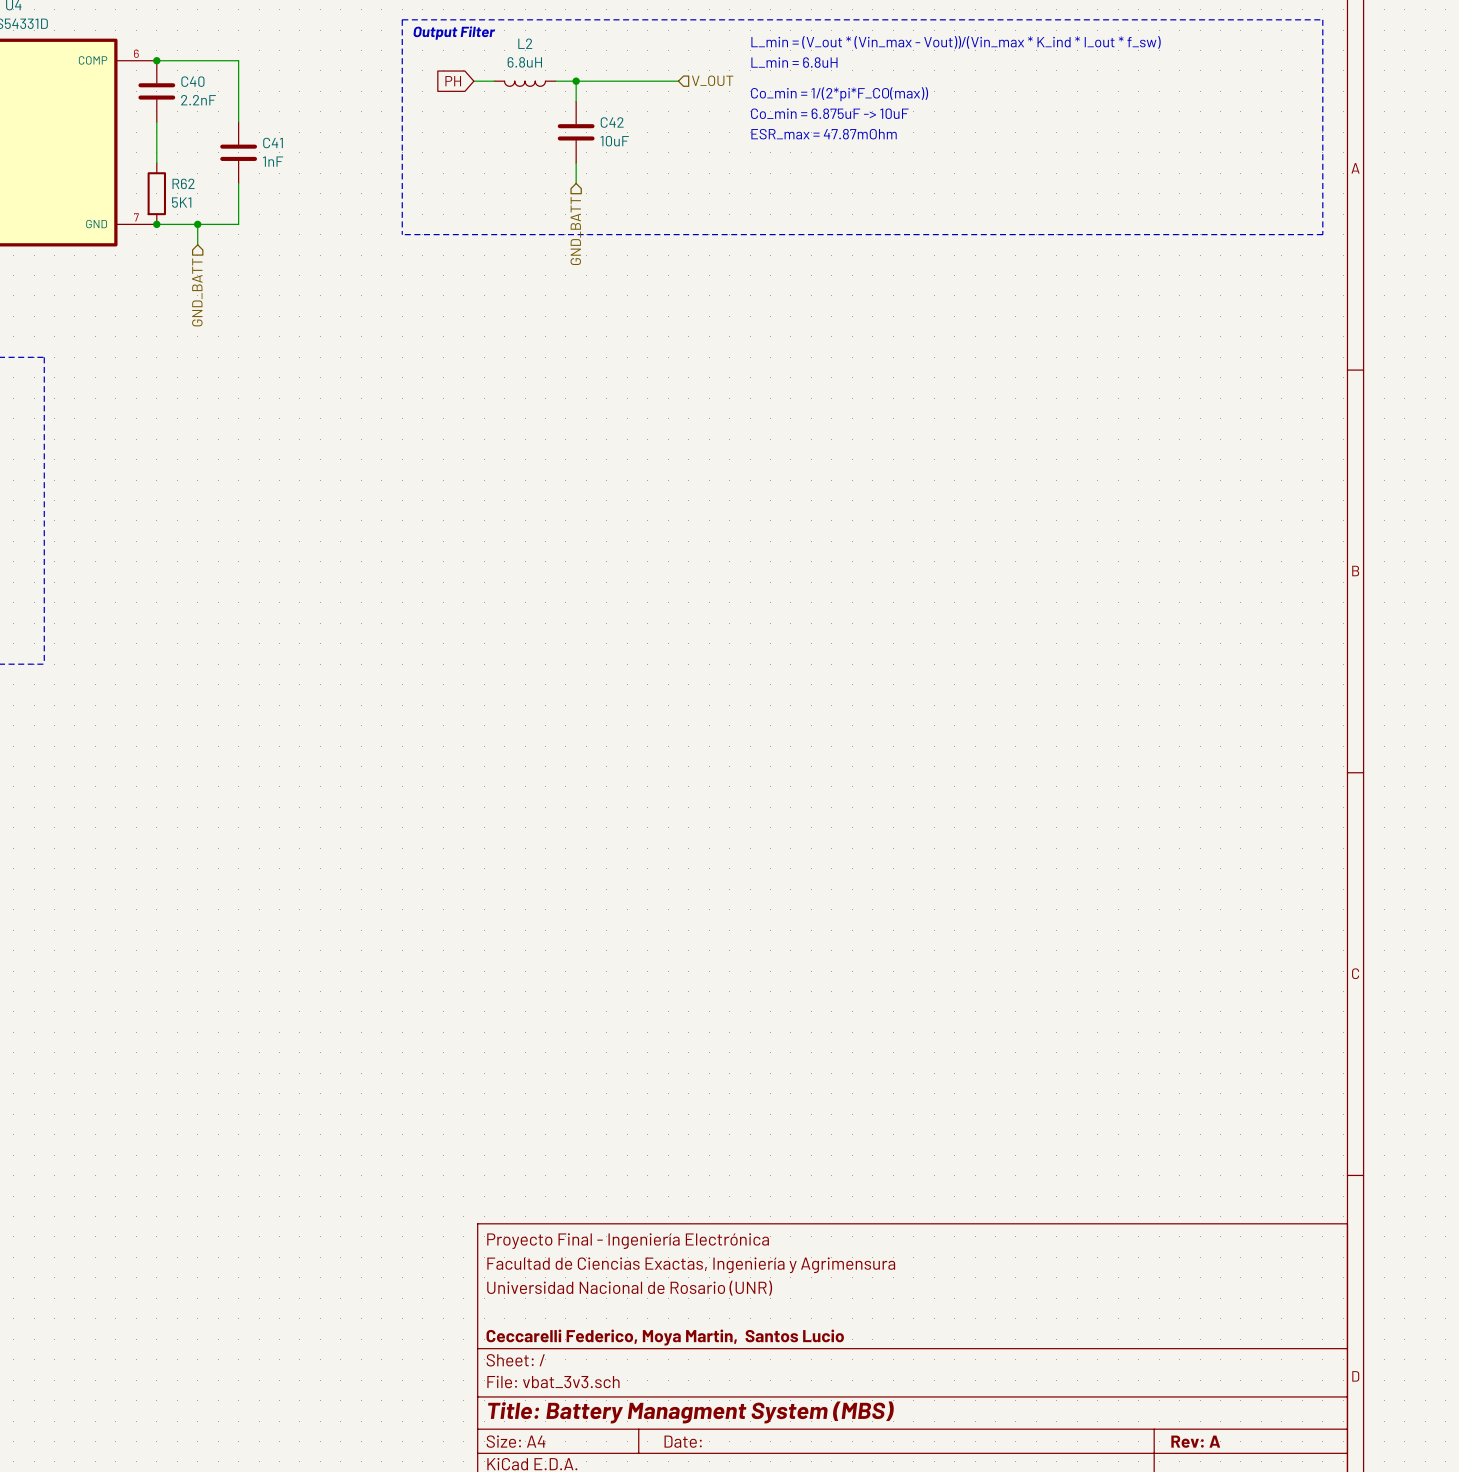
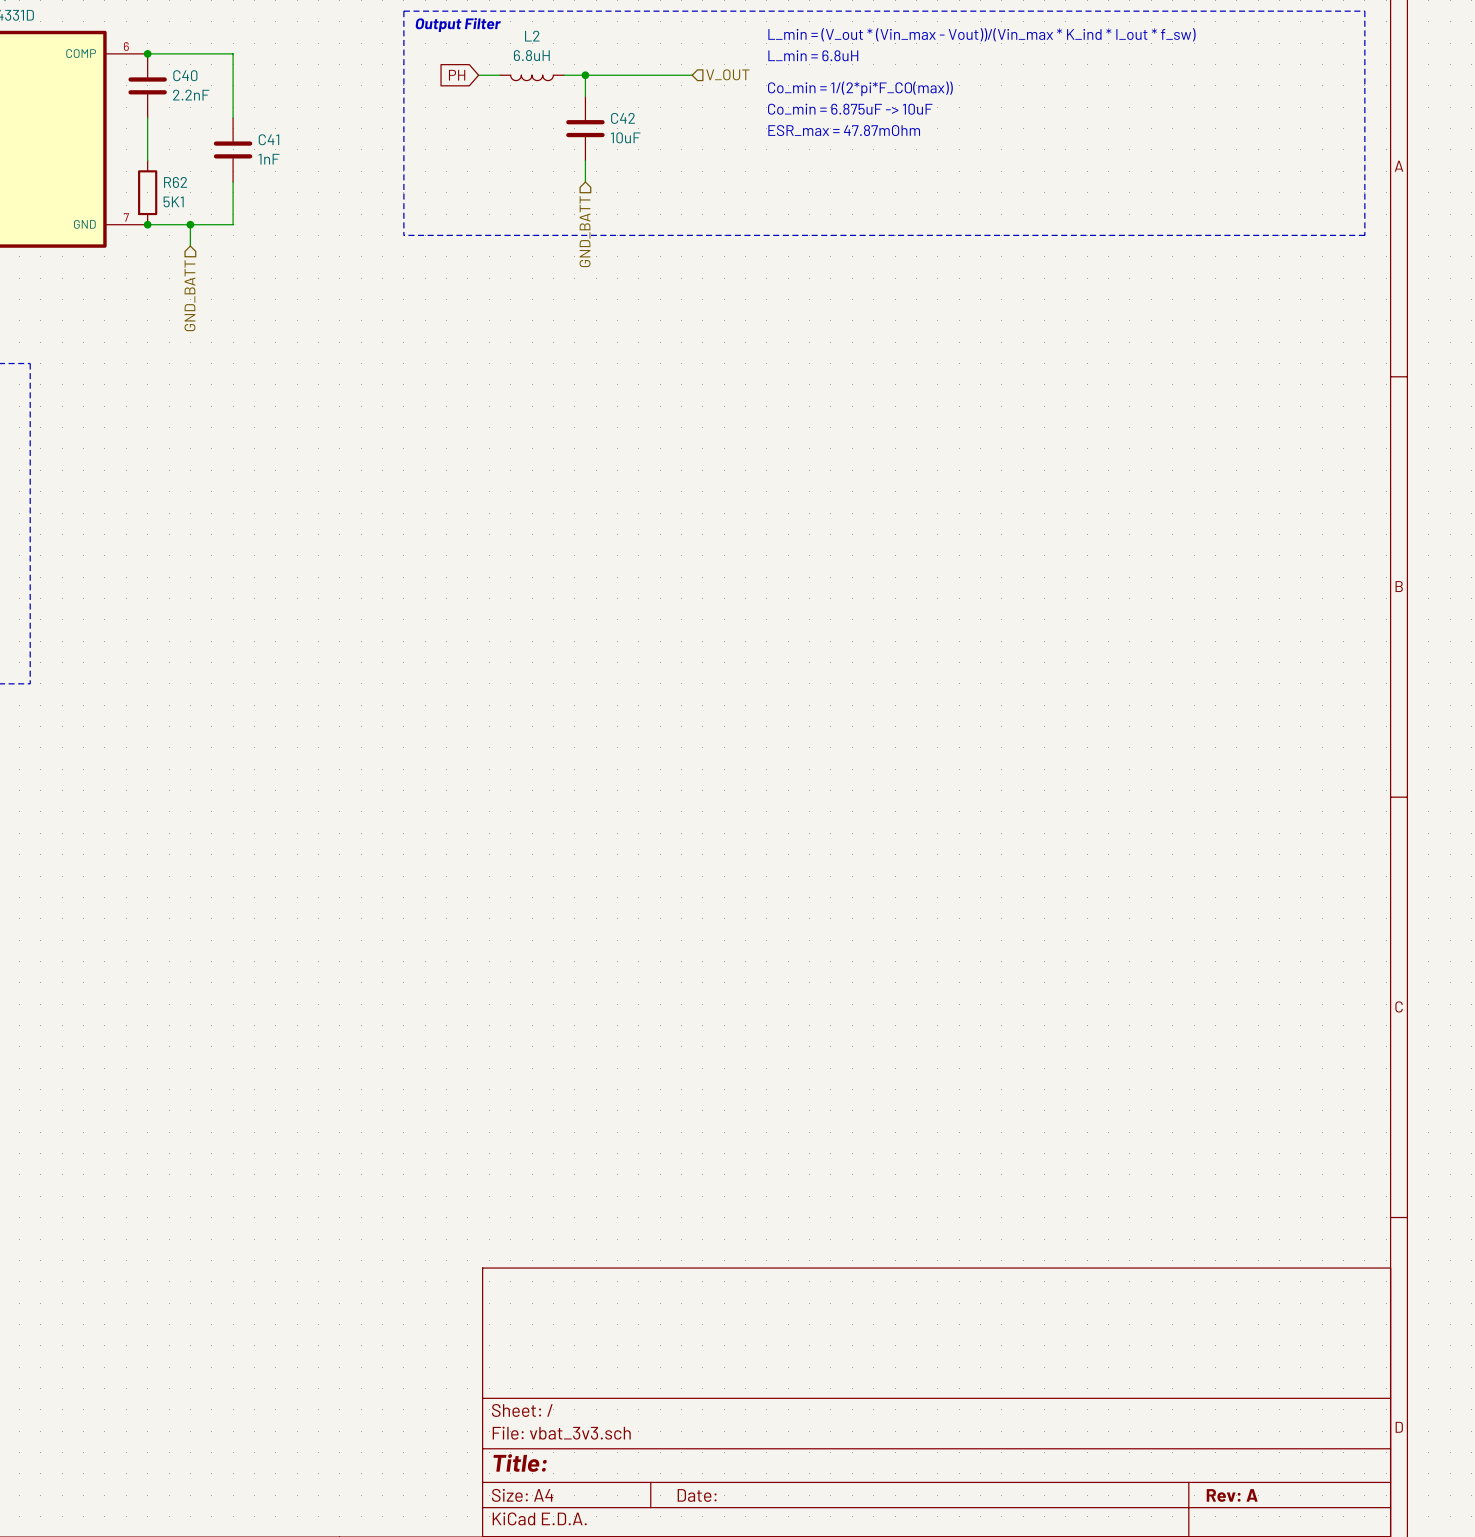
title block: Proyecto Final - Ingeniería Electrónica (628, 1241) -> none
title block: Facultad de Ciencias Exactas, Ingeniería y Agrimensura (691, 1265) -> none
title block: Universidad Nacional de Rosario (UNR) (629, 1288) -> none
title block: Ceccarelli Federico, Moya Martin, Santos Lucio (665, 1337) -> none
title block: Title: Battery Managment System (MBS) (691, 1412) -> Title: (520, 1463)

